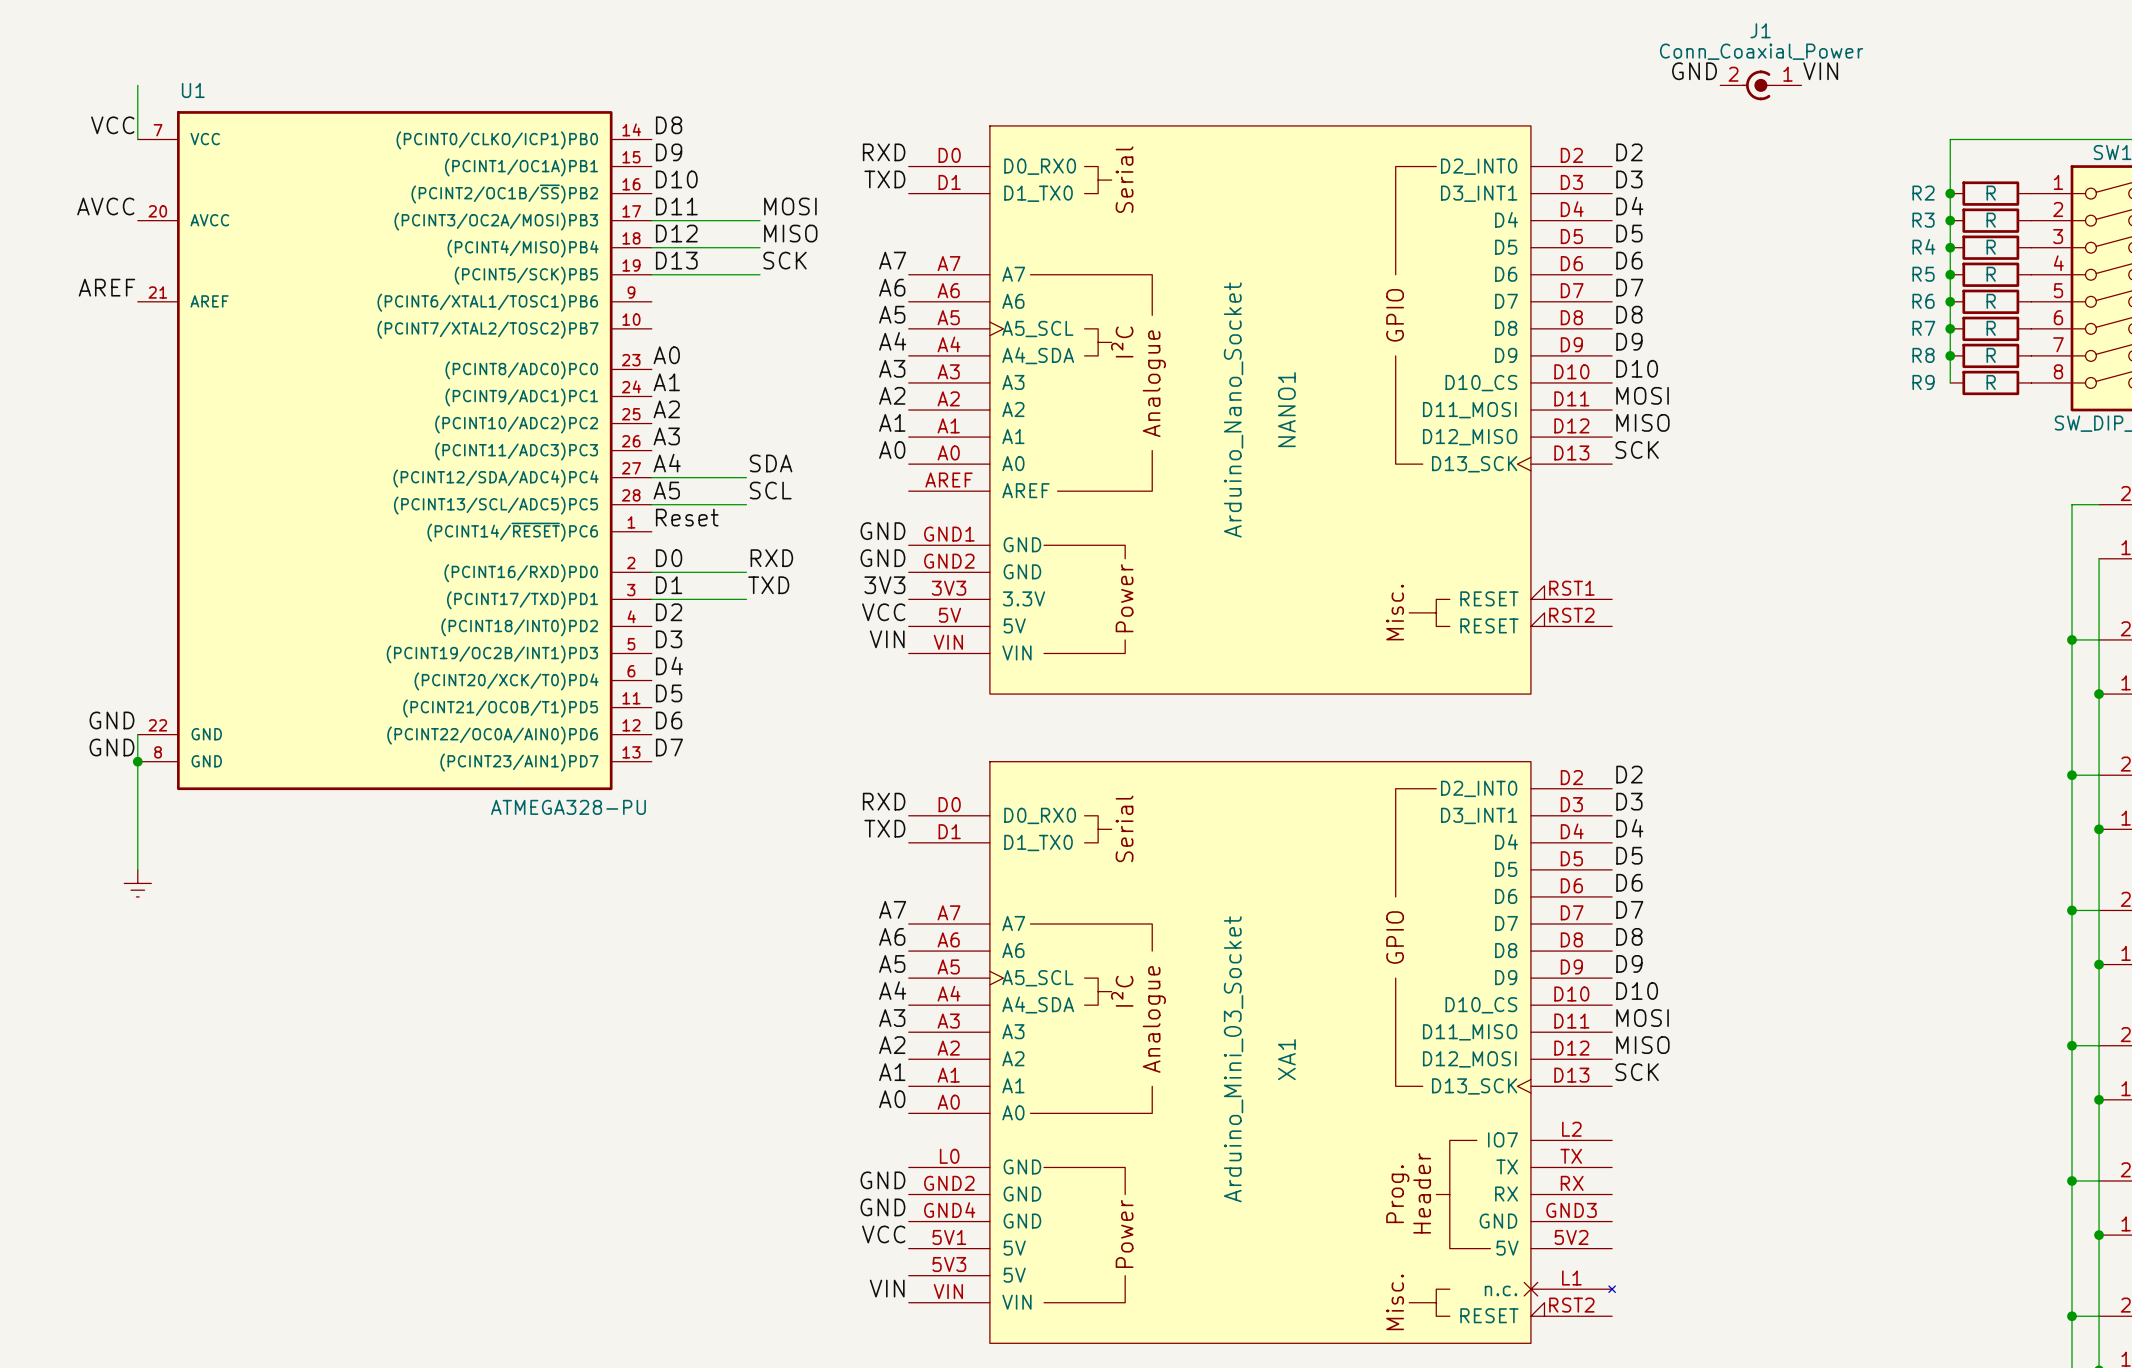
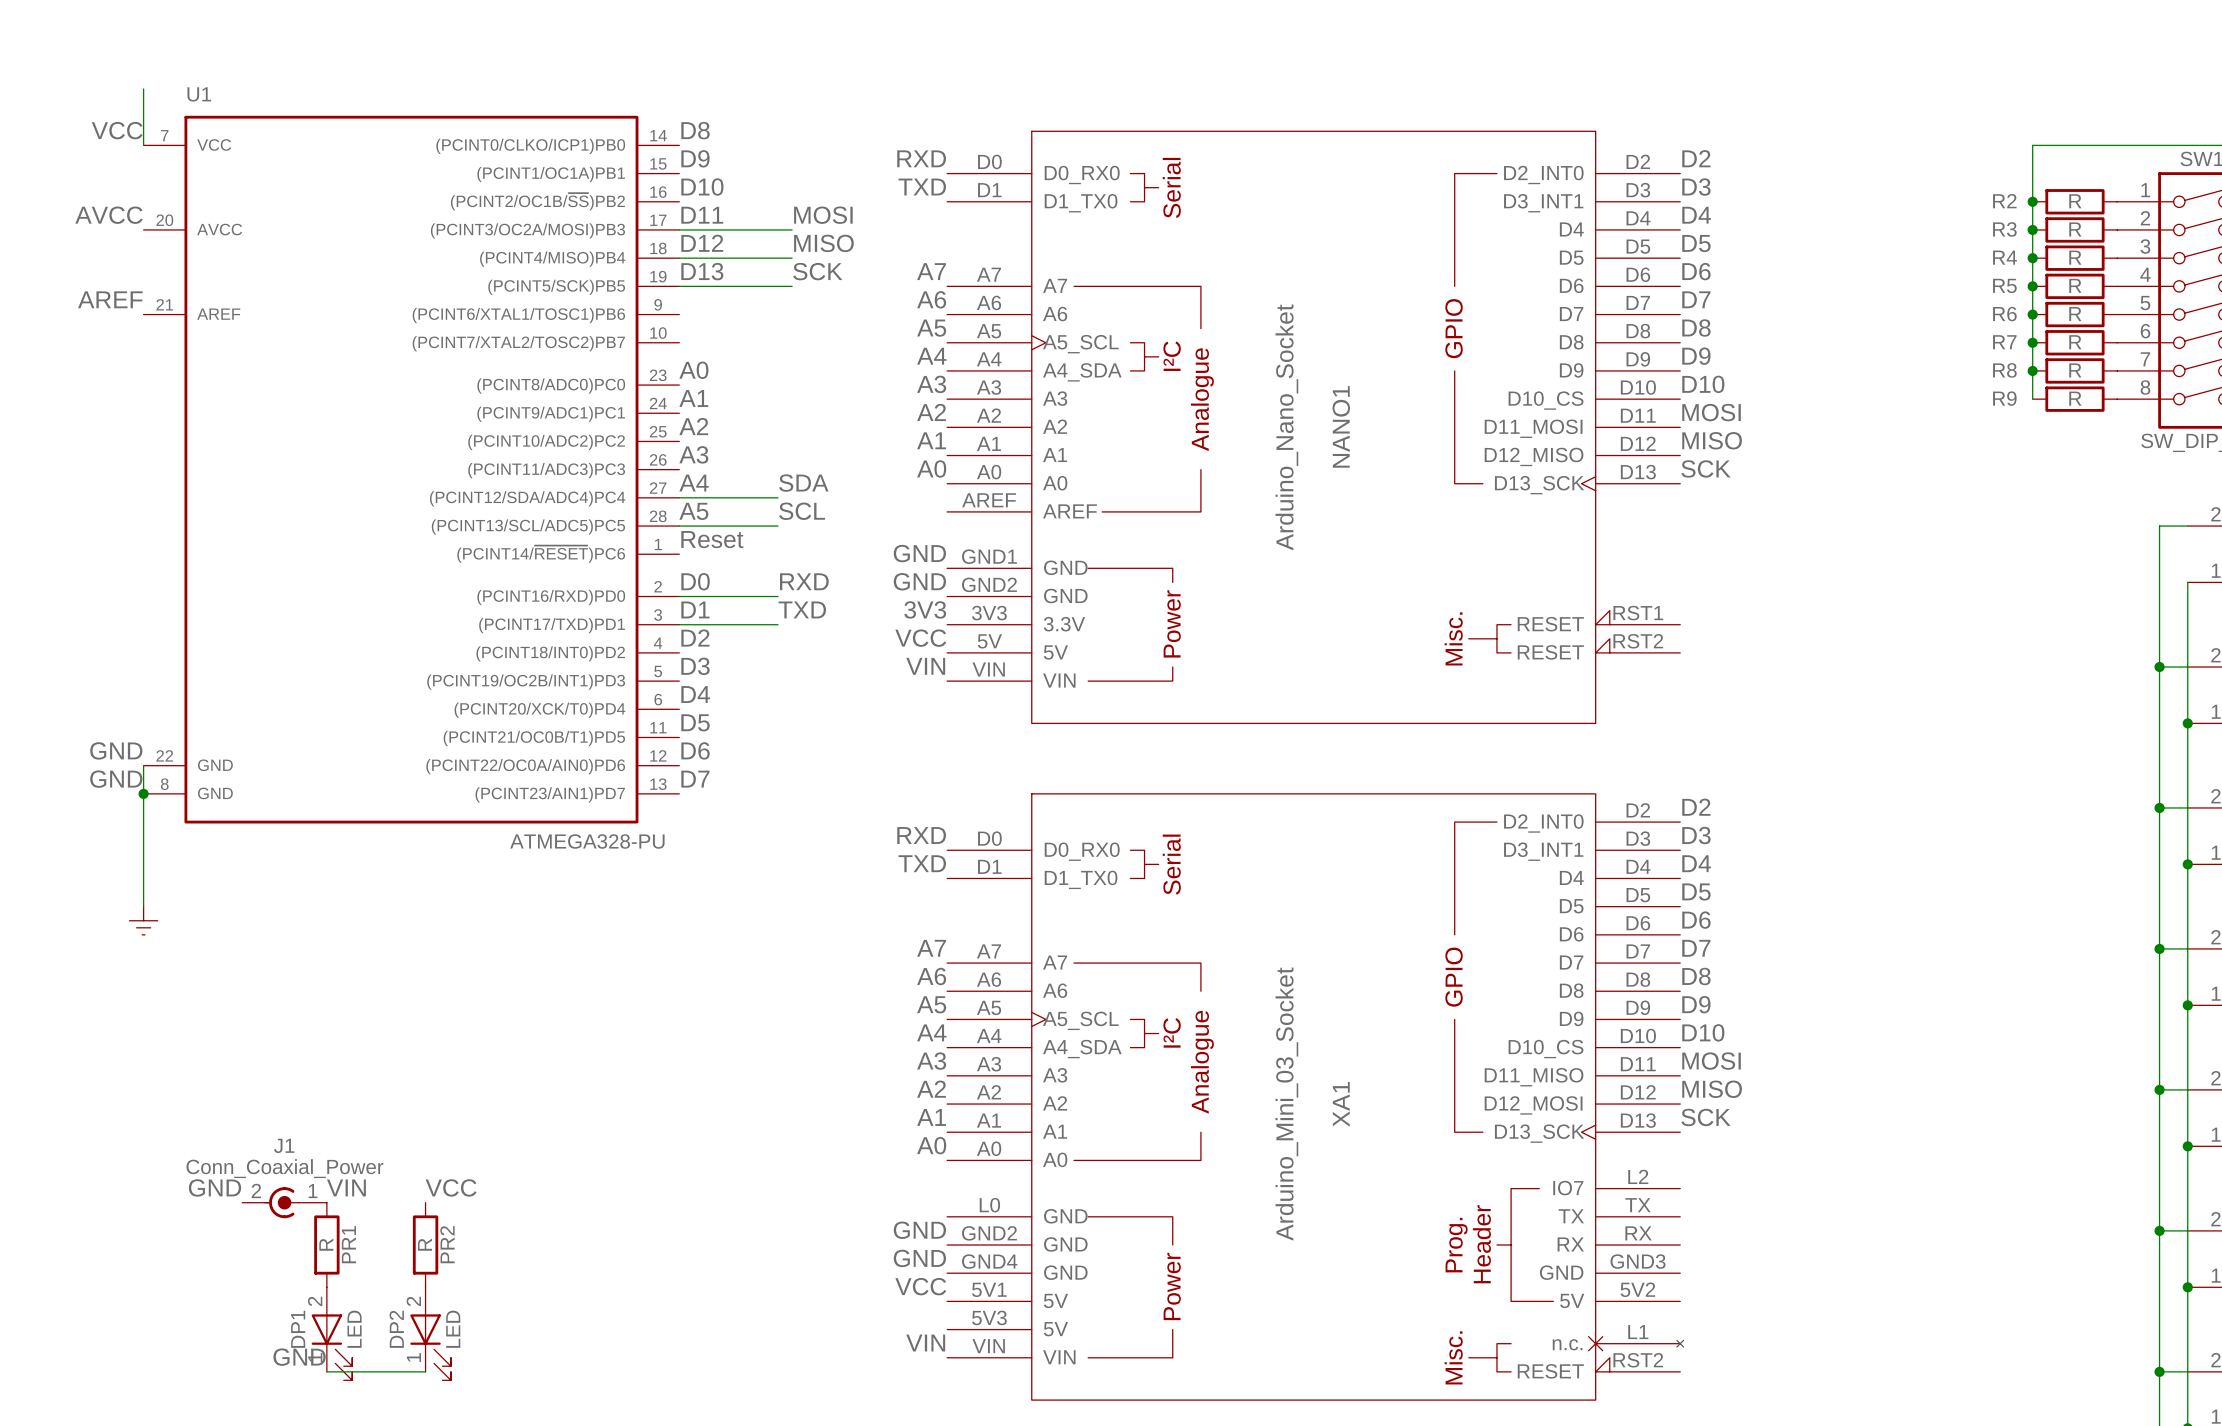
label: GND (1694, 71) -> none
label: VIN (1820, 71) -> none
J1 position: (1760, 85) -> (284, 1202)
label: none -> GND (215, 1187)
label: none -> VIN (346, 1187)
label: none -> VCC (451, 1187)
PR1: none -> R (326, 1245)
PR2: none -> R (425, 1245)
DP1: none -> LED (331, 1333)
DP2: none -> LED (430, 1333)
label: none -> GND (299, 1357)
wire: none -> (326, 1371) (425, 1371)

